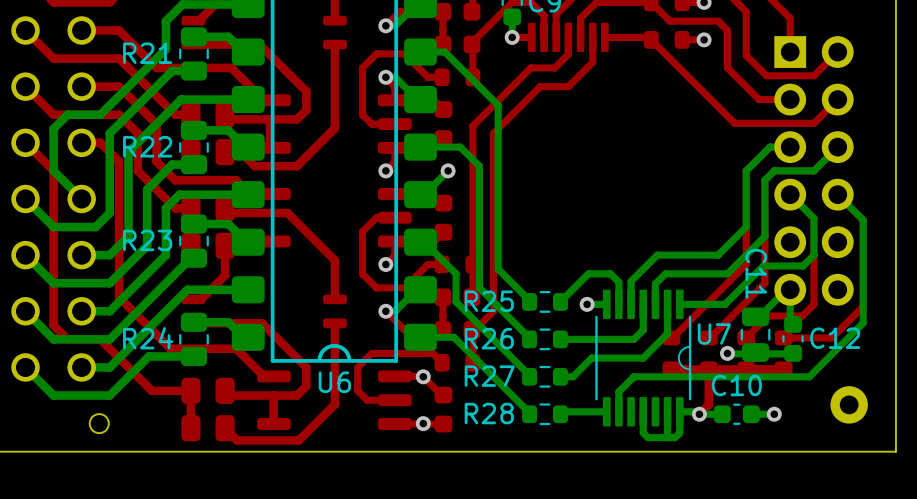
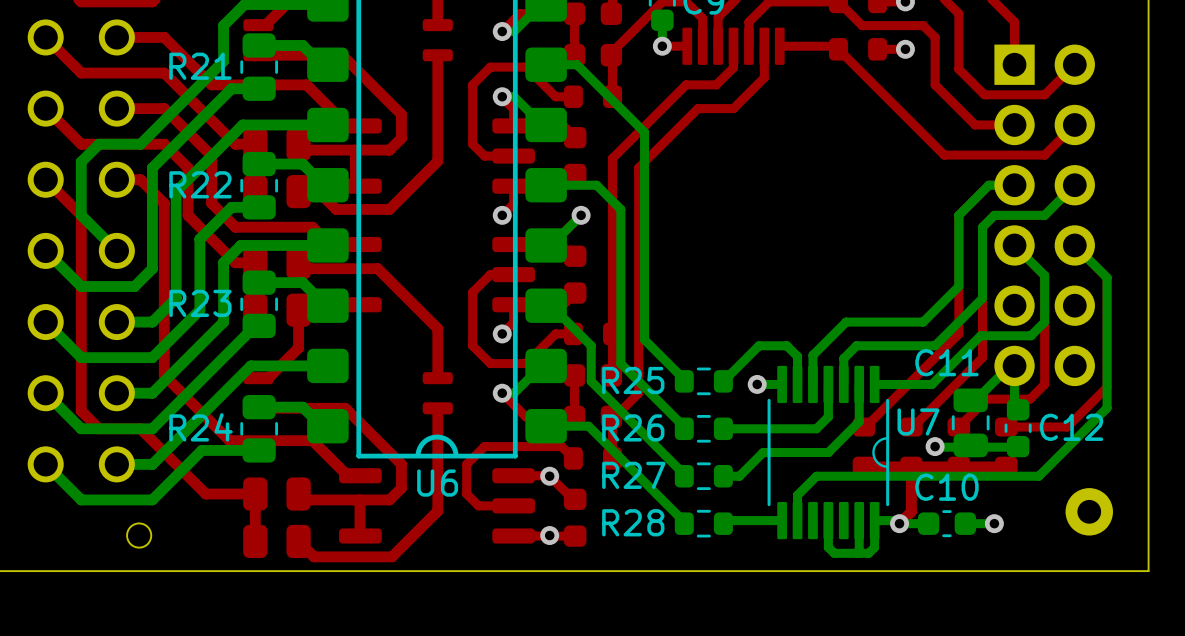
C11 name rotation: 0° (756, 273) -> 90° counterclockwise (946, 362)

